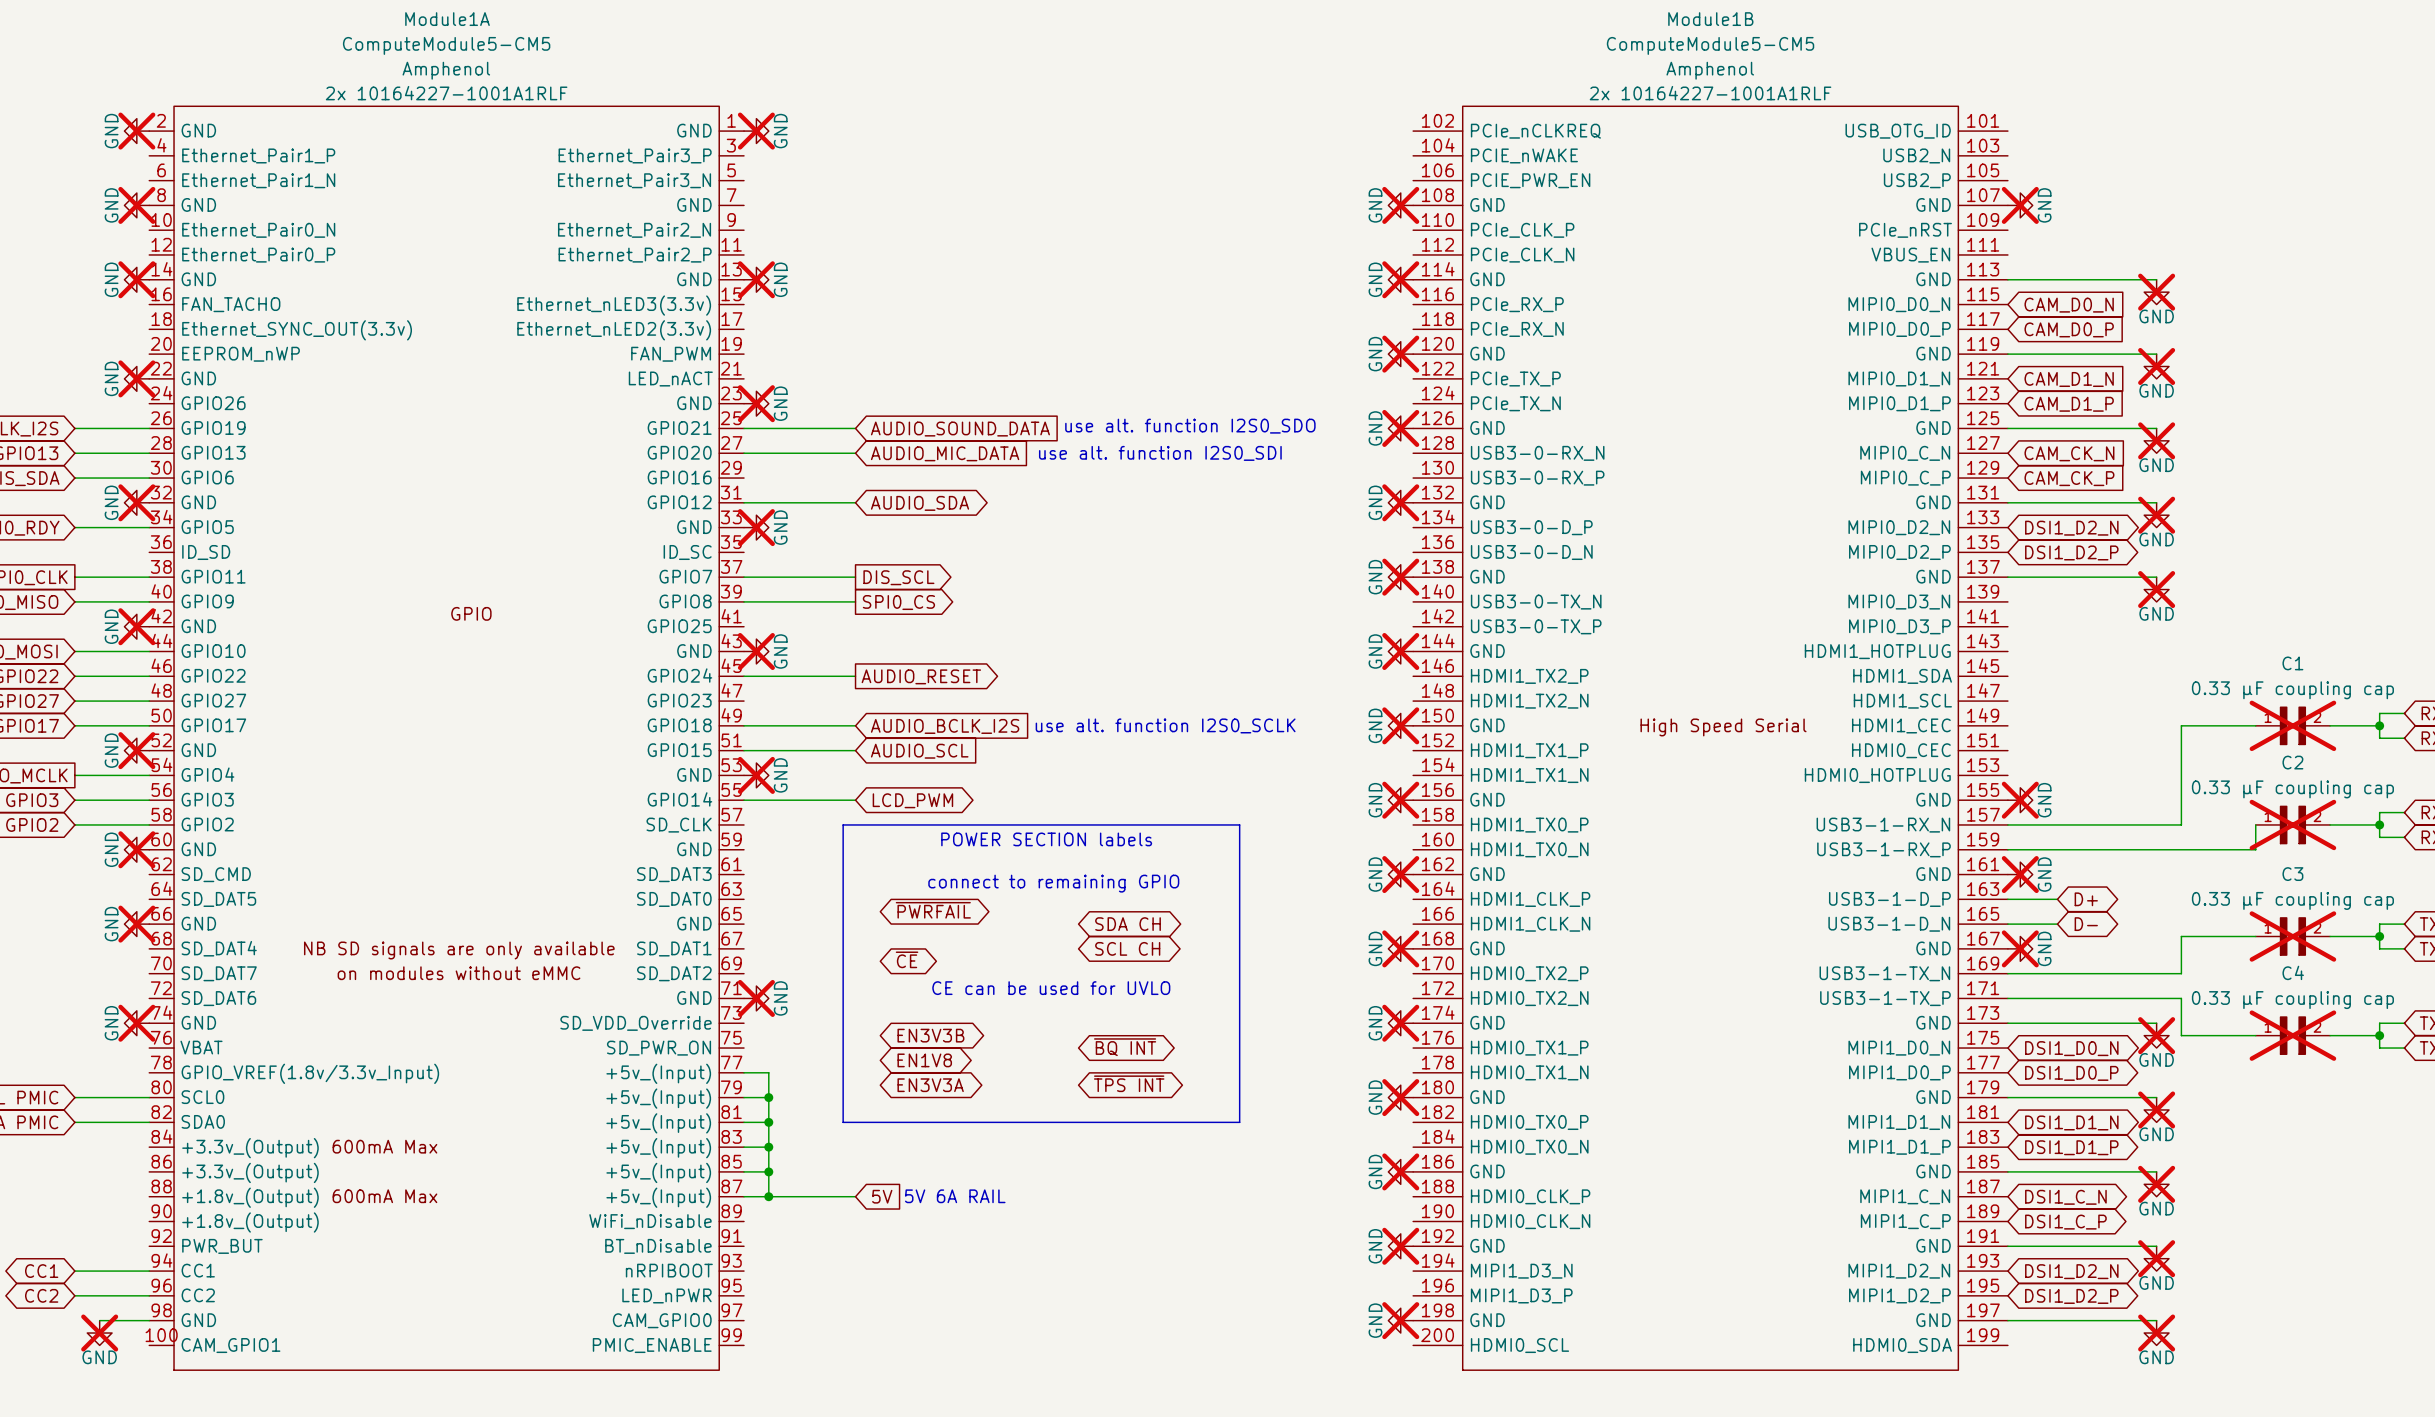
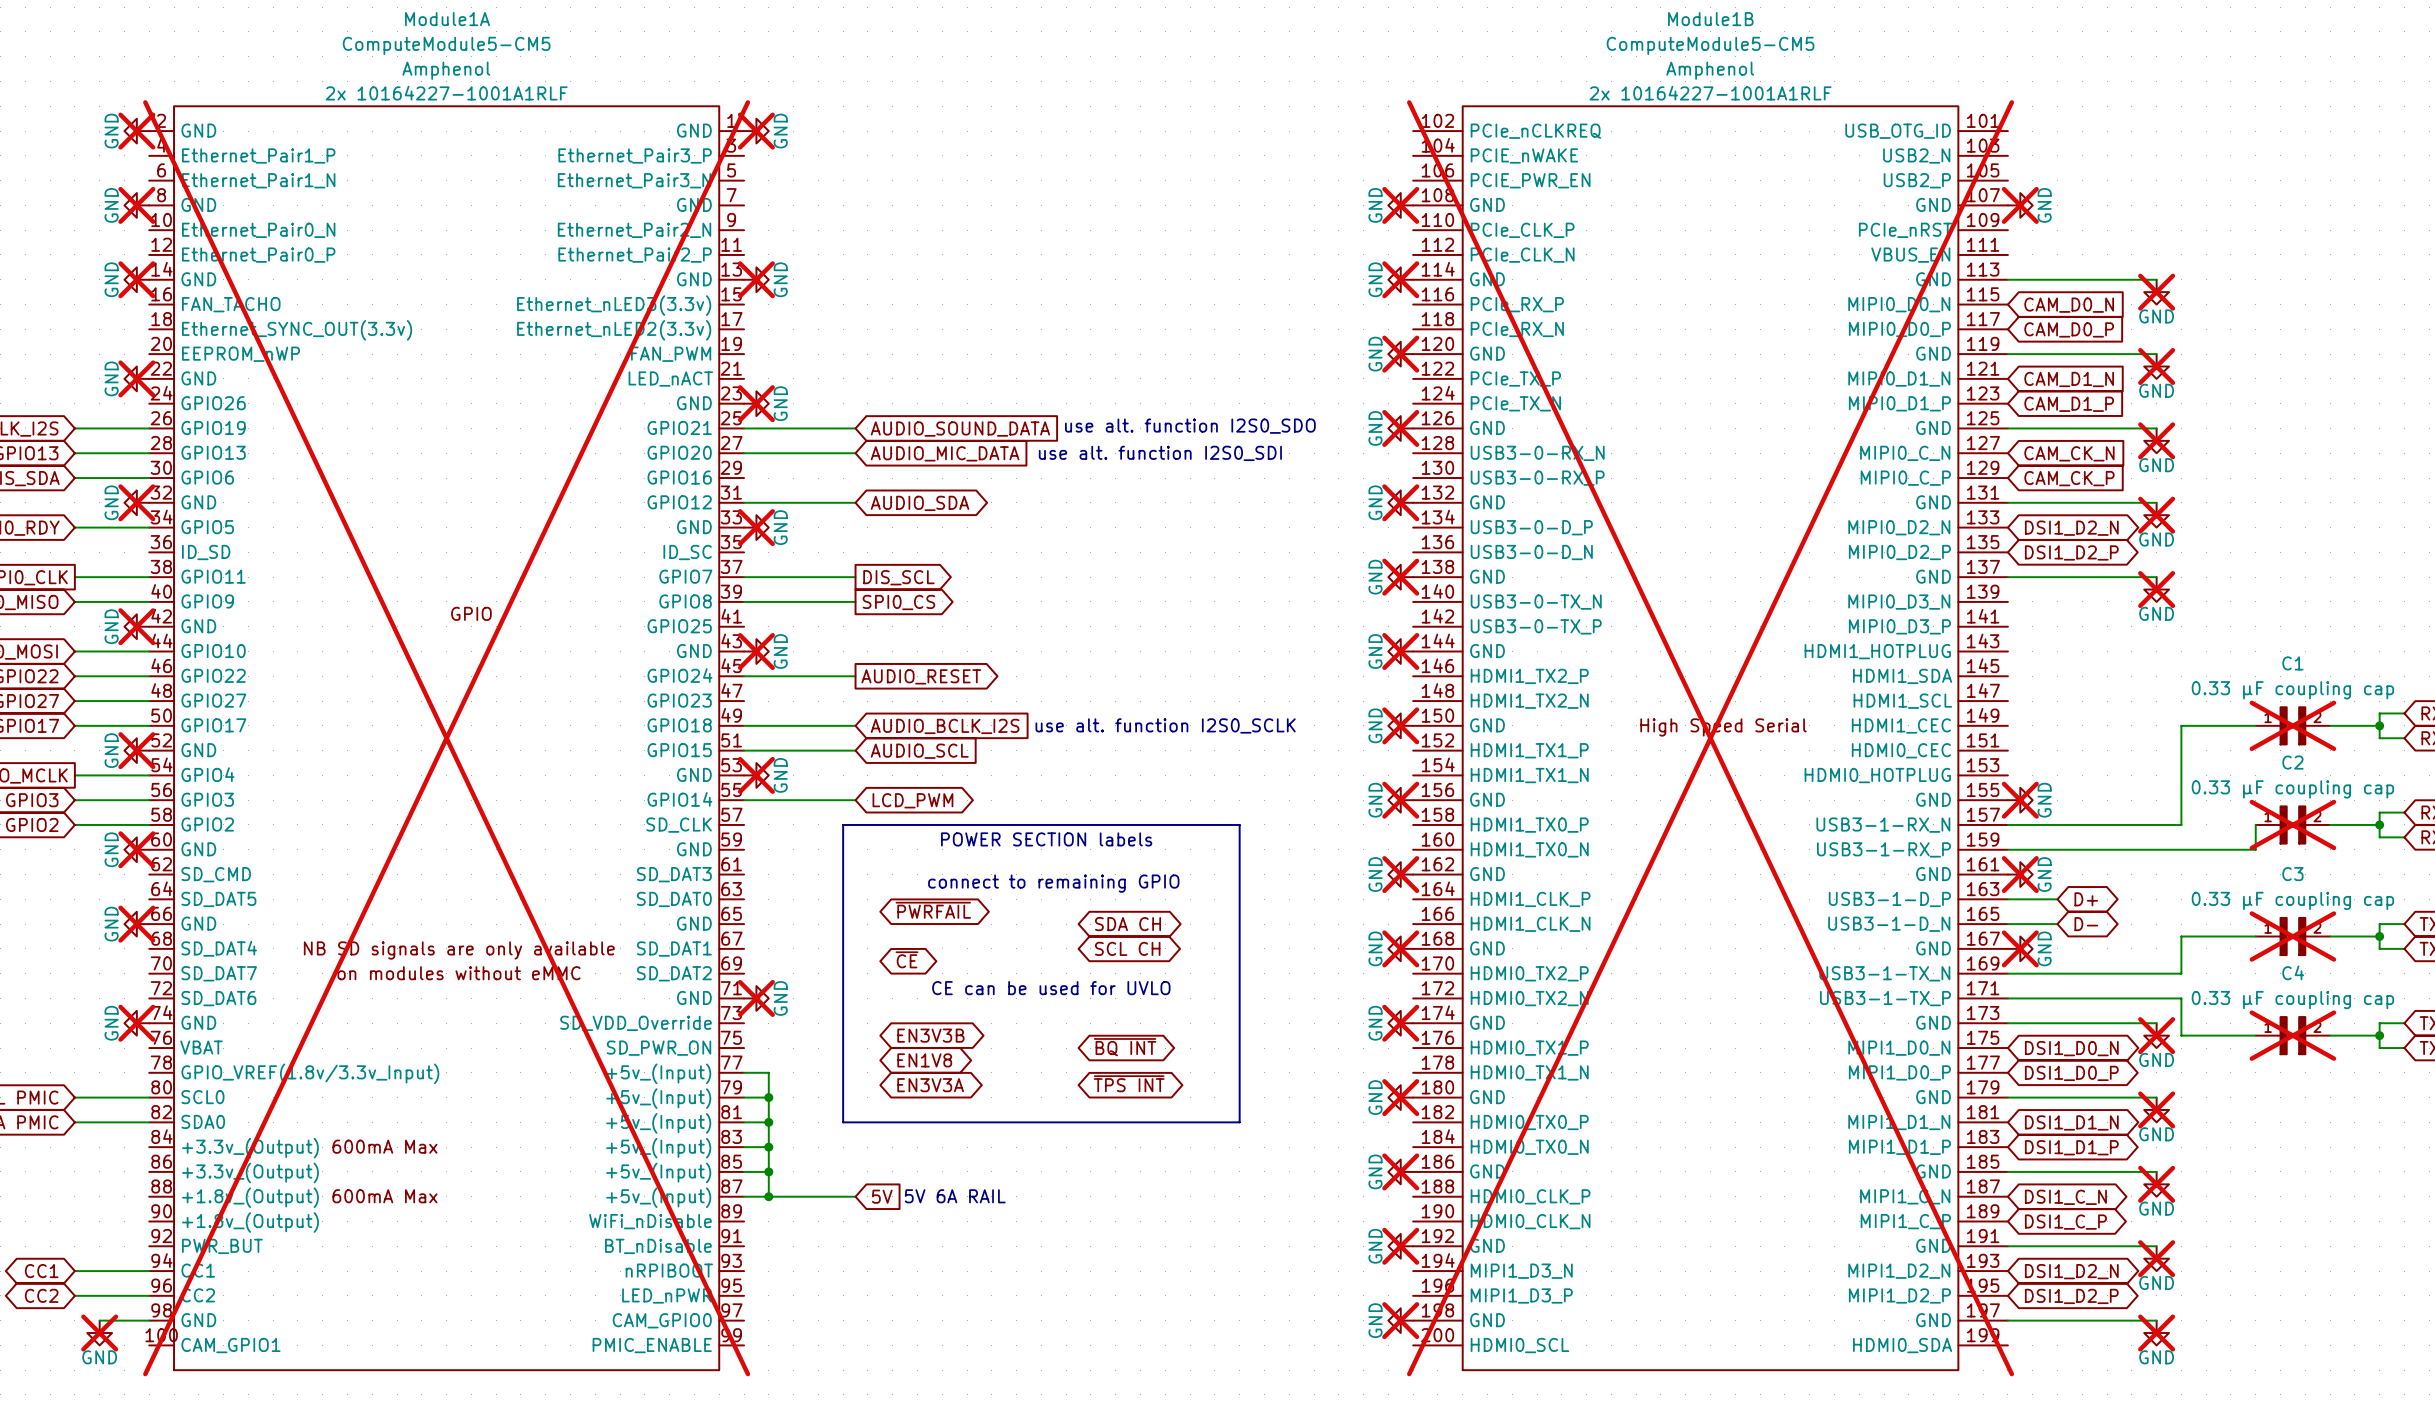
Module1A do-not-place cross: none -> (446, 738)
Module1B do-not-place cross: none -> (1710, 738)

